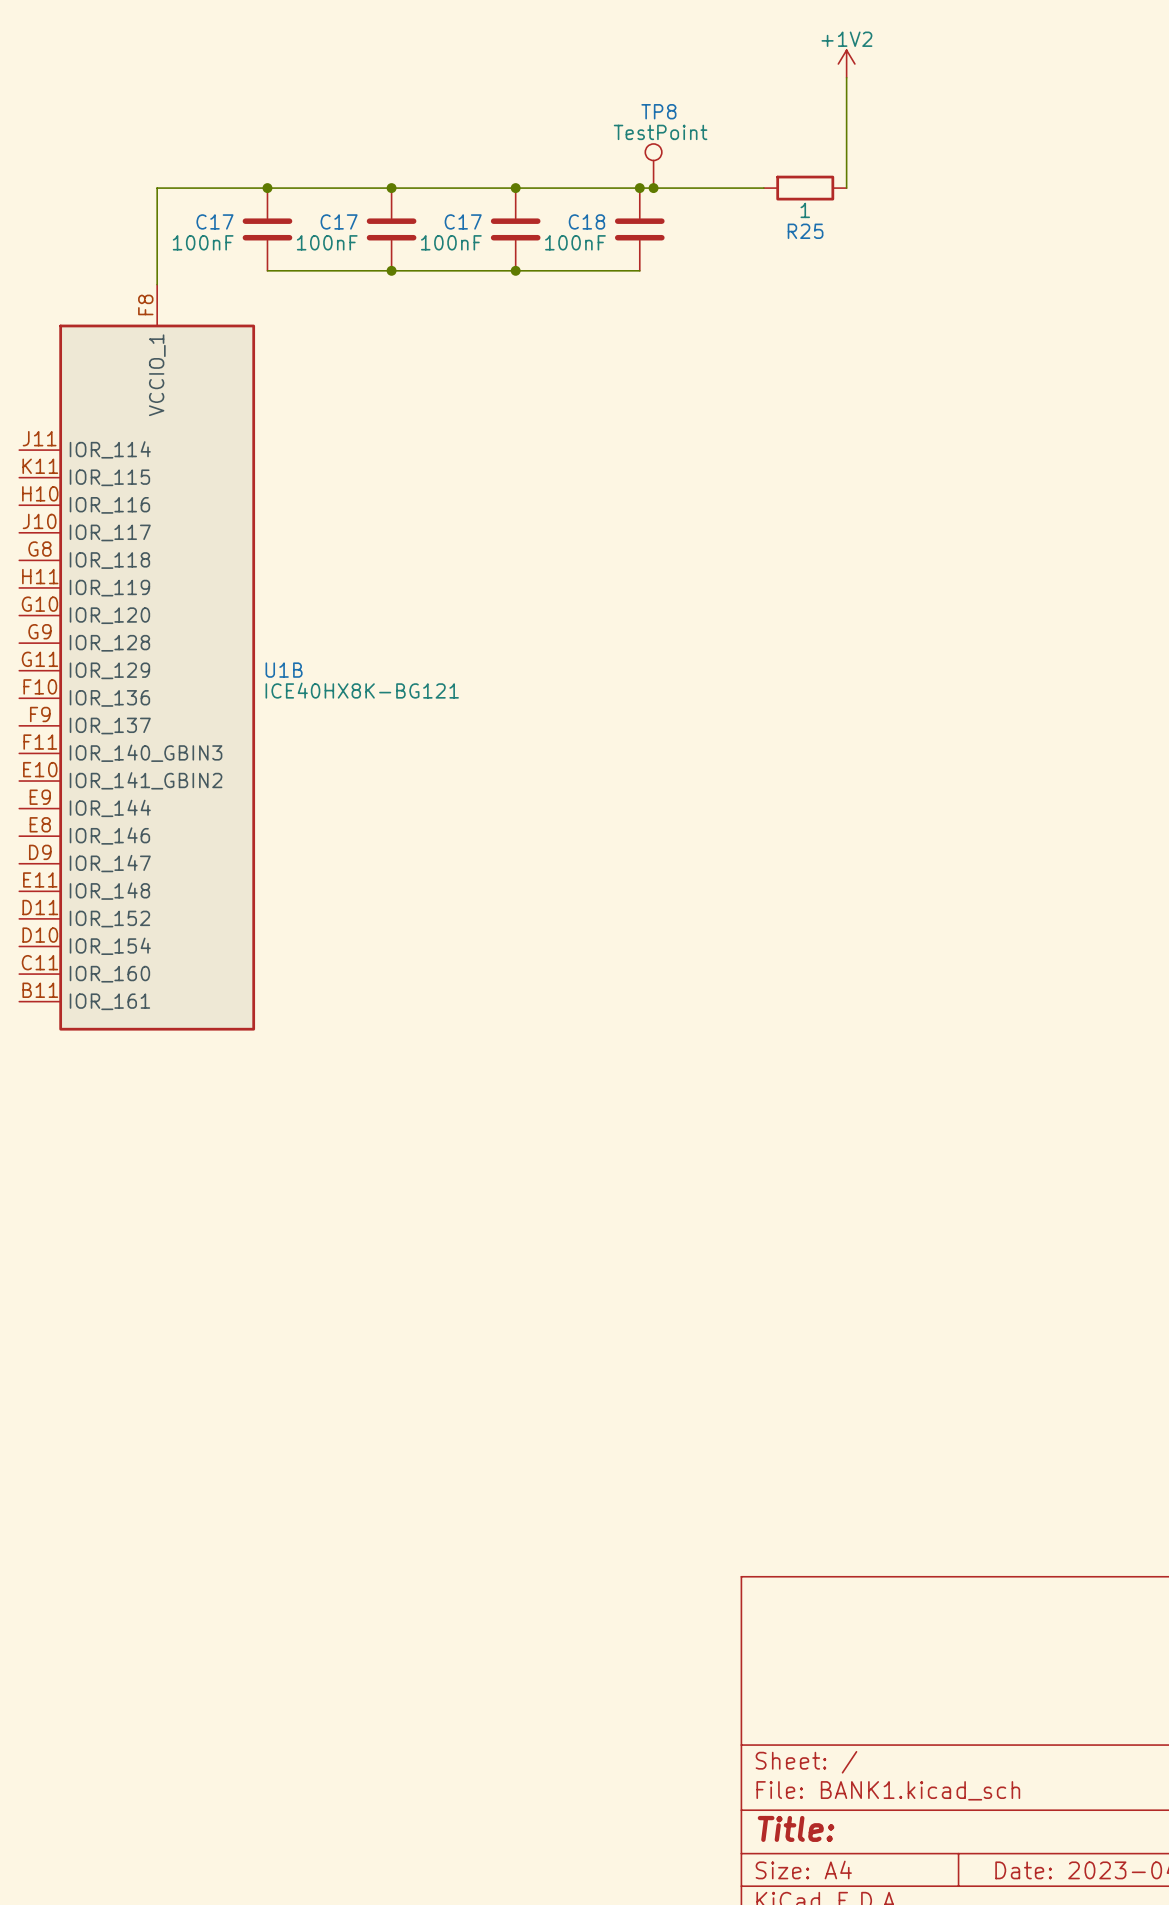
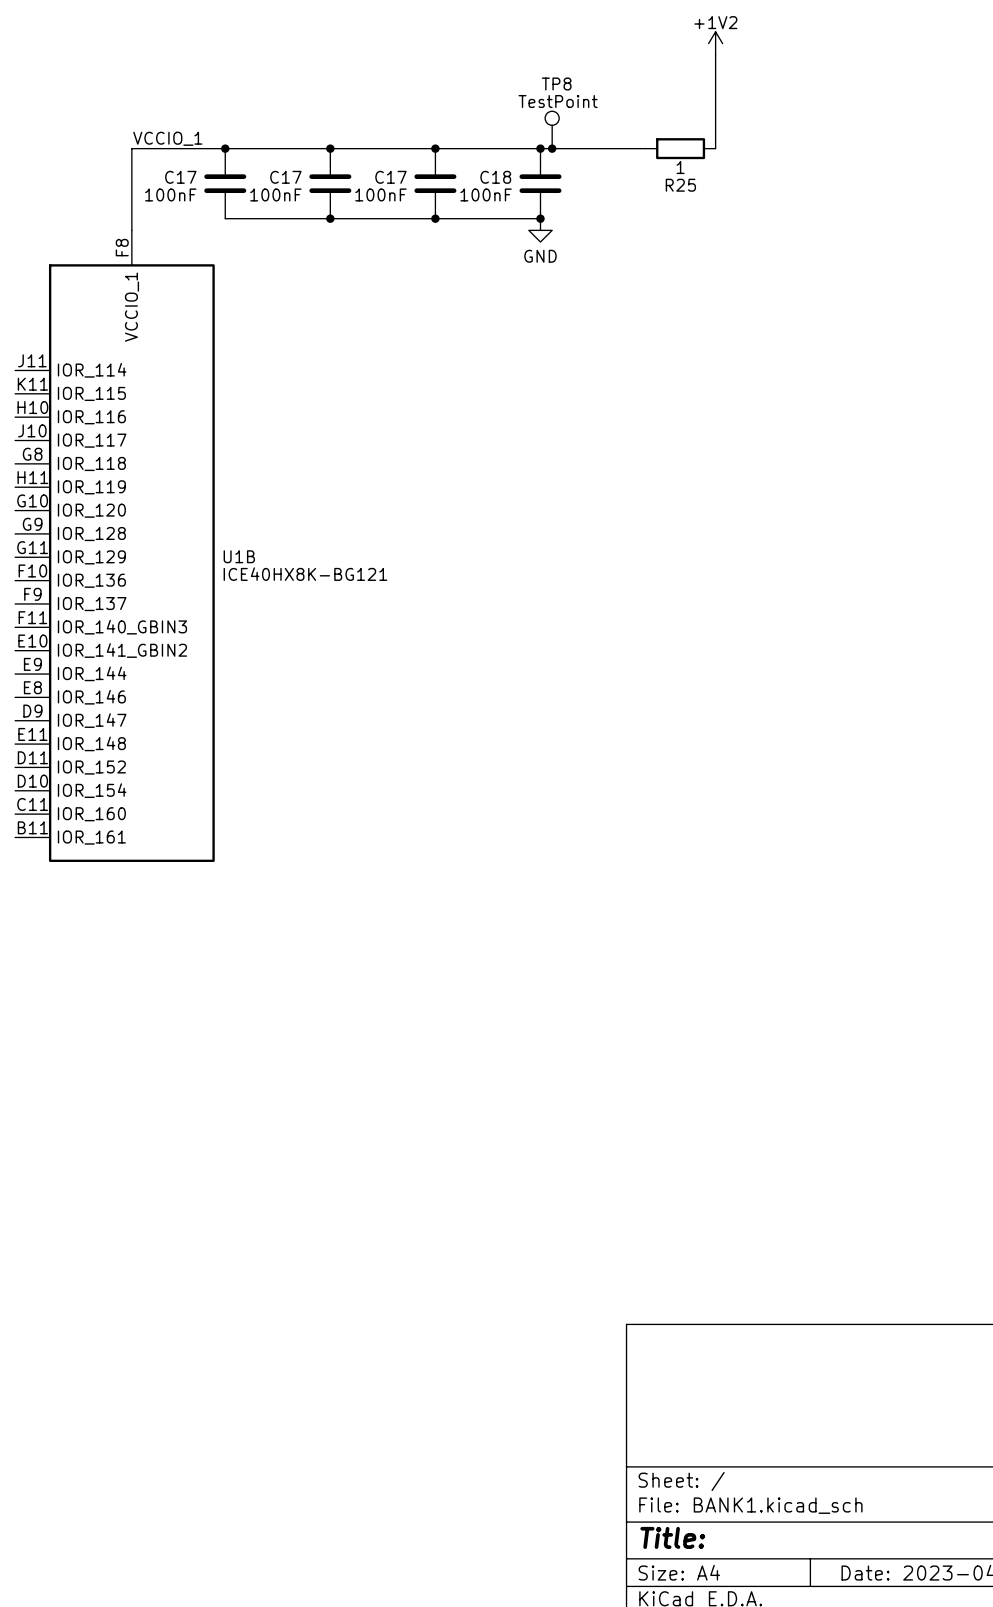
label: none -> VCCIO_1 (167, 138)
junction: none -> (540, 218)
power symbol: none -> GND (540, 230)

